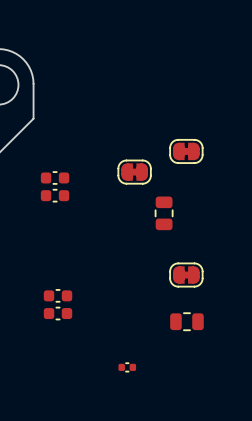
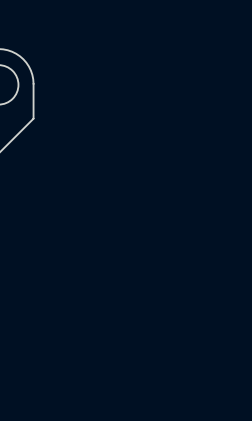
part: (186, 151) -> none
part: (134, 172) -> none
part: (55, 177) -> none
part: (55, 195) -> none
part: (164, 213) -> none
part: (186, 275) -> none
part: (58, 295) -> none
part: (58, 313) -> none
part: (186, 321) -> none
part: (127, 367) -> none

